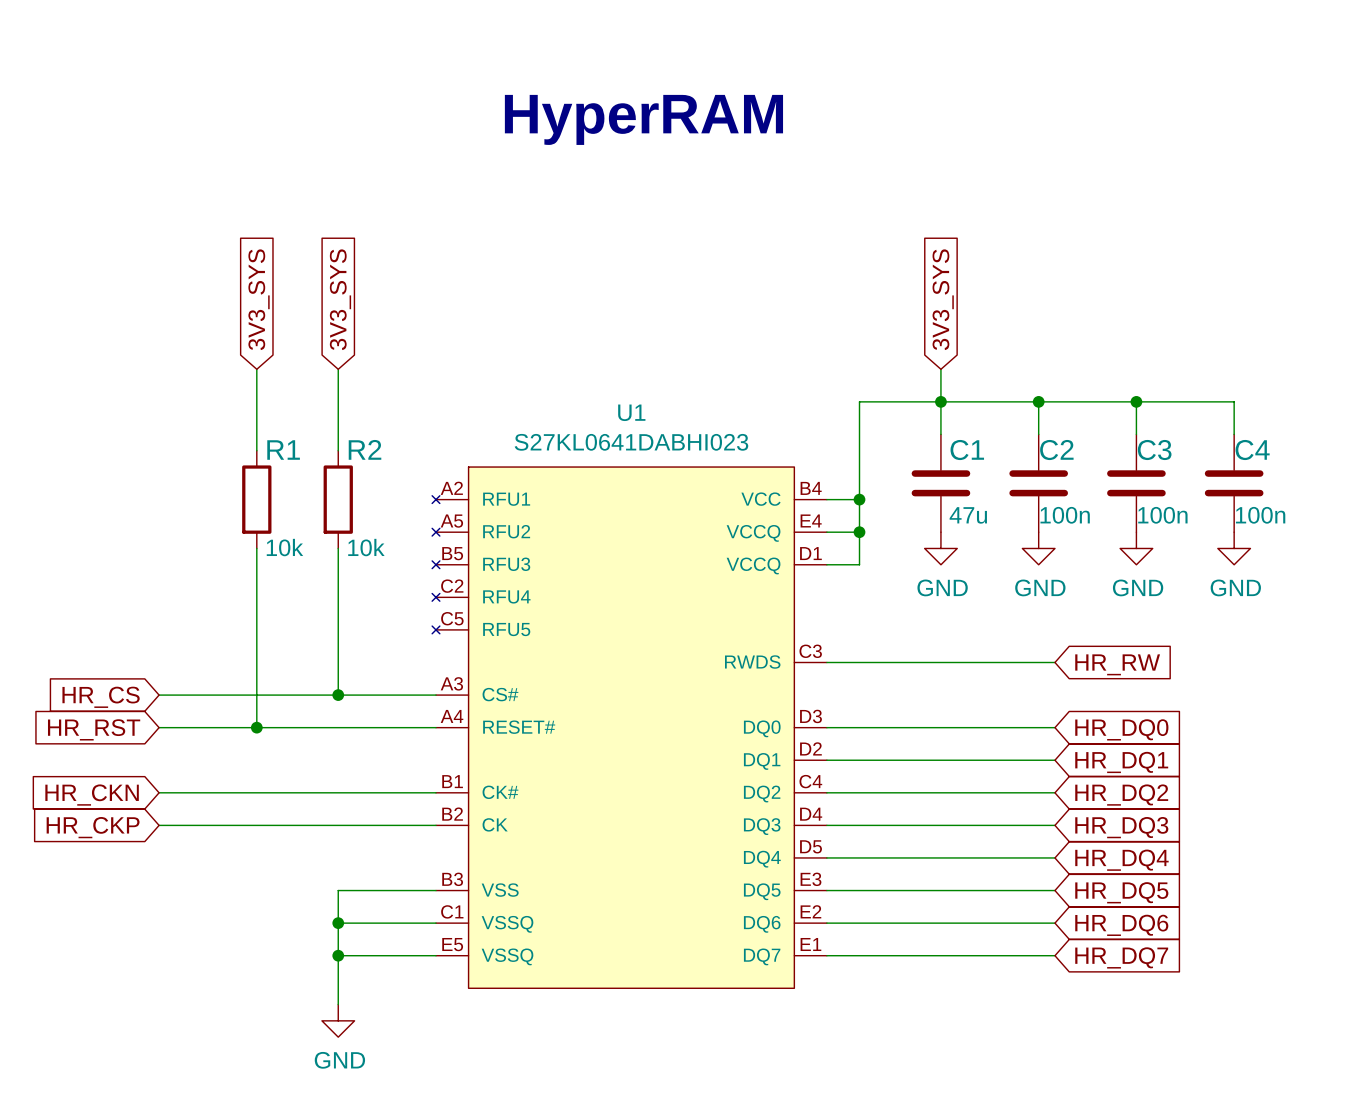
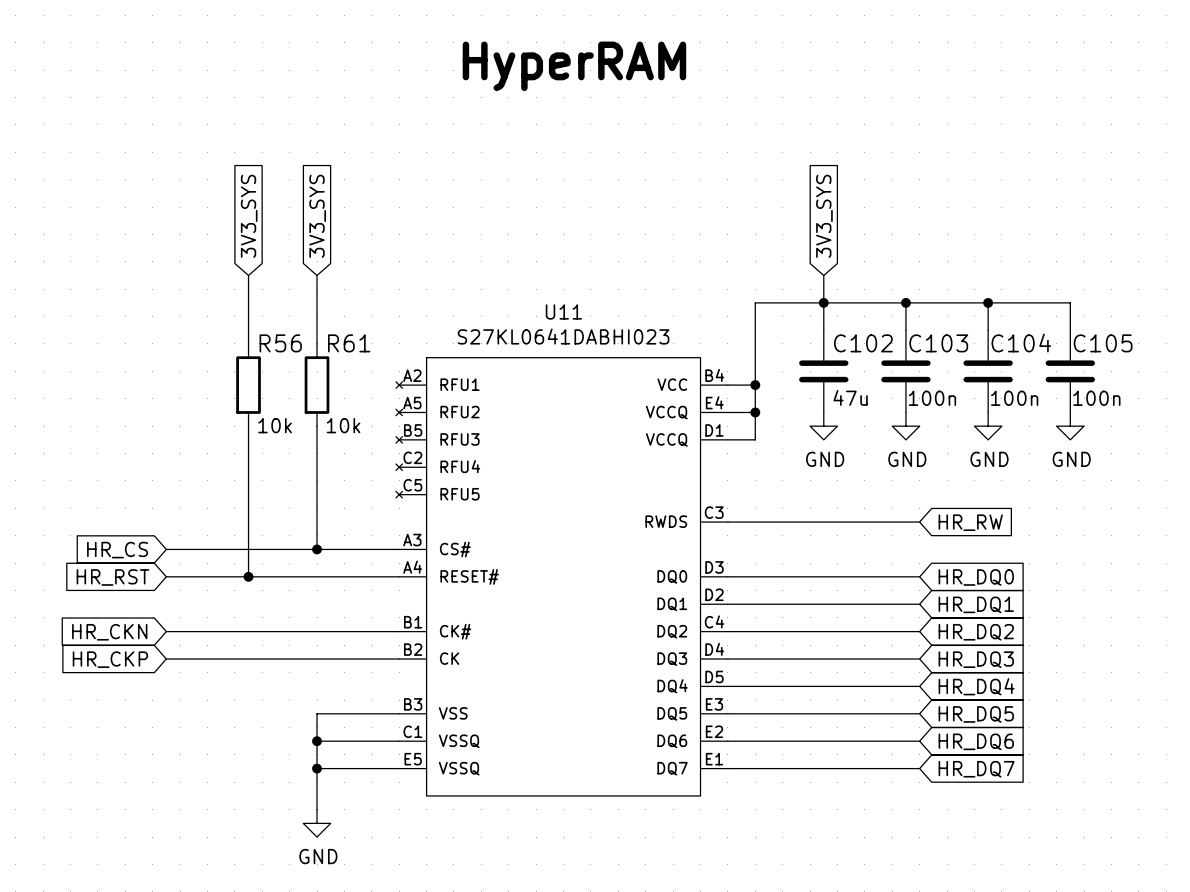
U1 name: U1 (631, 412) -> U11 (563, 311)
R2 name: R2 (365, 449) -> R61 (349, 343)
R1 name: R1 (283, 450) -> R56 (280, 343)
C1 name: C1 (967, 450) -> C102 (863, 343)
C2 name: C2 (1056, 450) -> C103 (938, 343)
C3 name: C3 (1154, 450) -> C104 (1021, 342)
C4 name: C4 (1252, 450) -> C105 (1103, 343)

